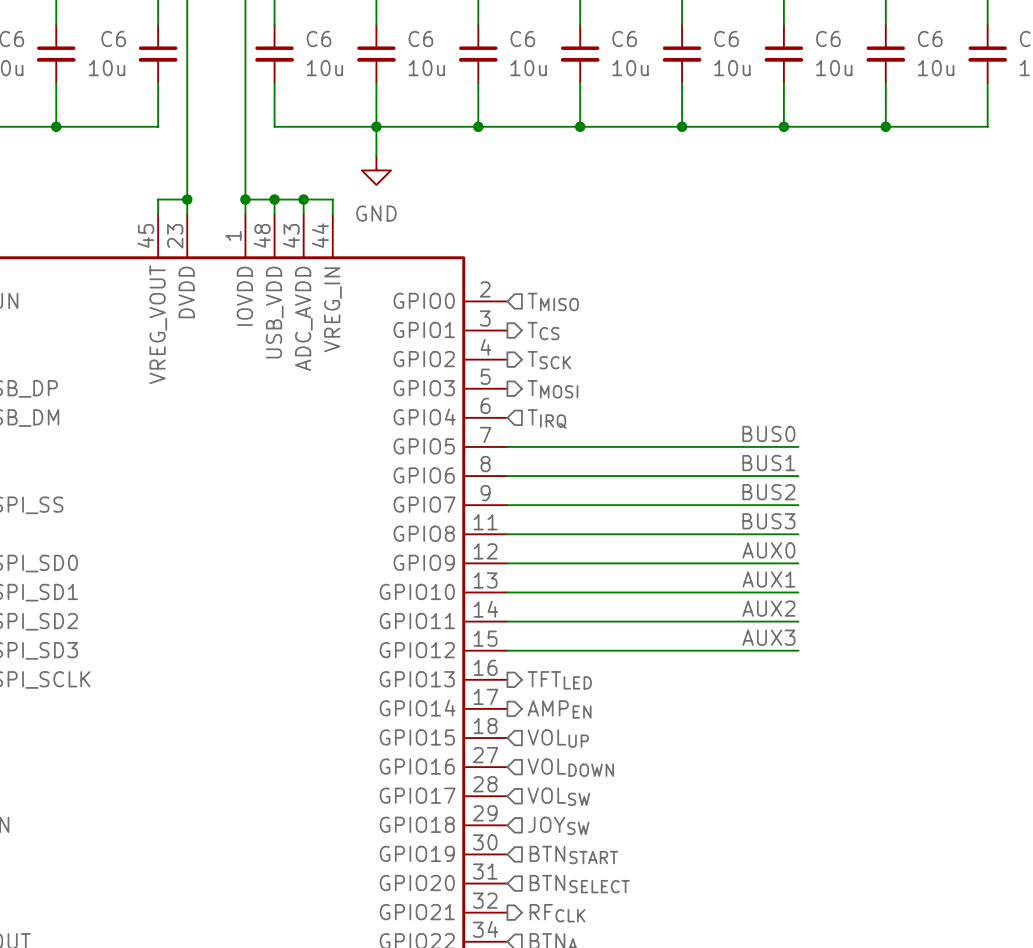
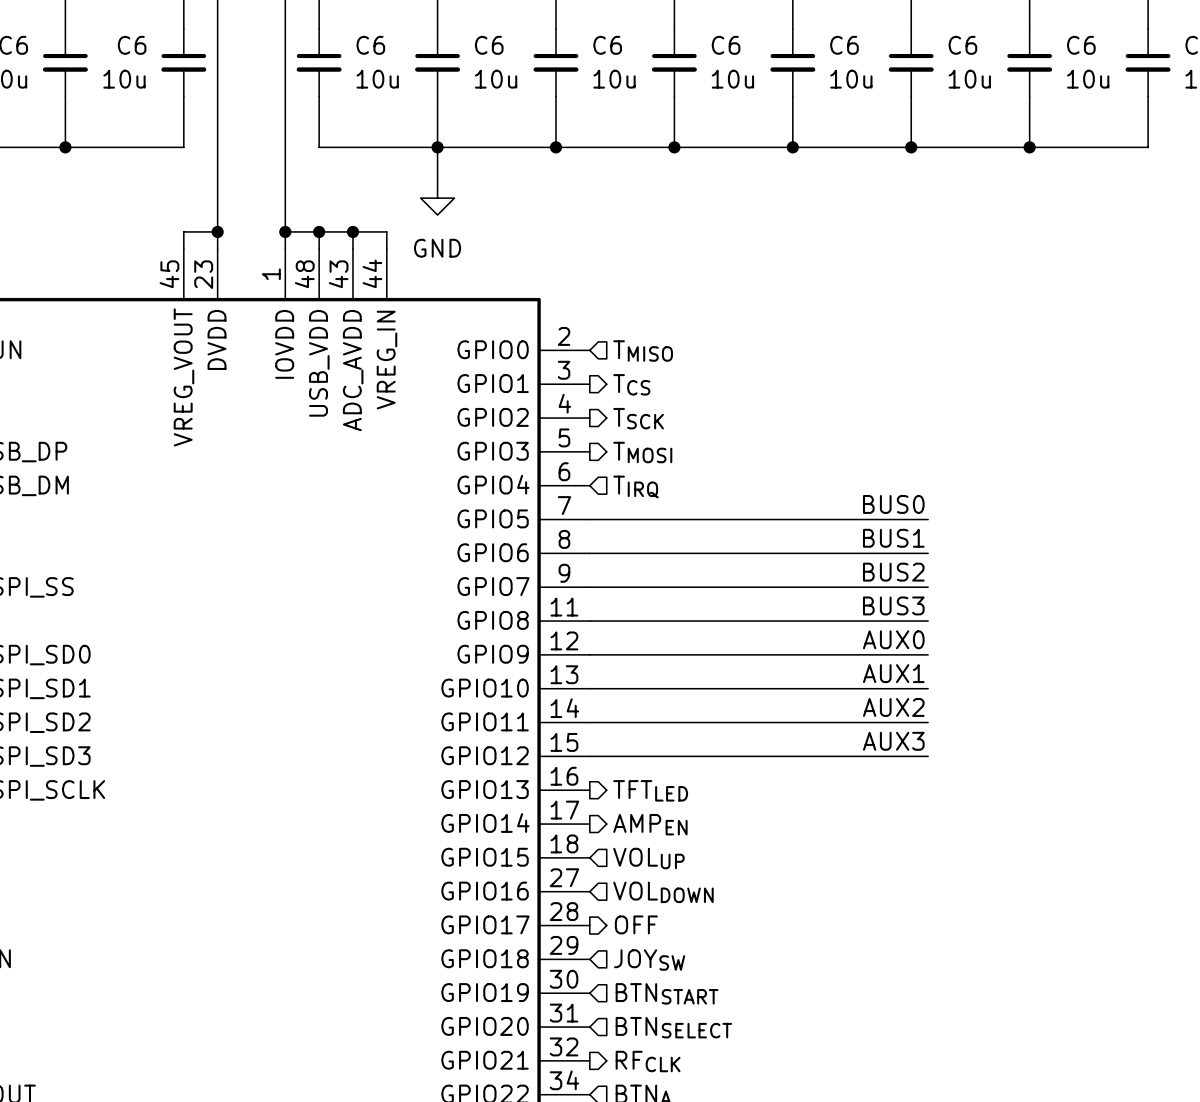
hierarchical label shape: input (558, 796) -> output (636, 924)
hierarchical label: VOLSW (558, 796) -> OFF (636, 924)

